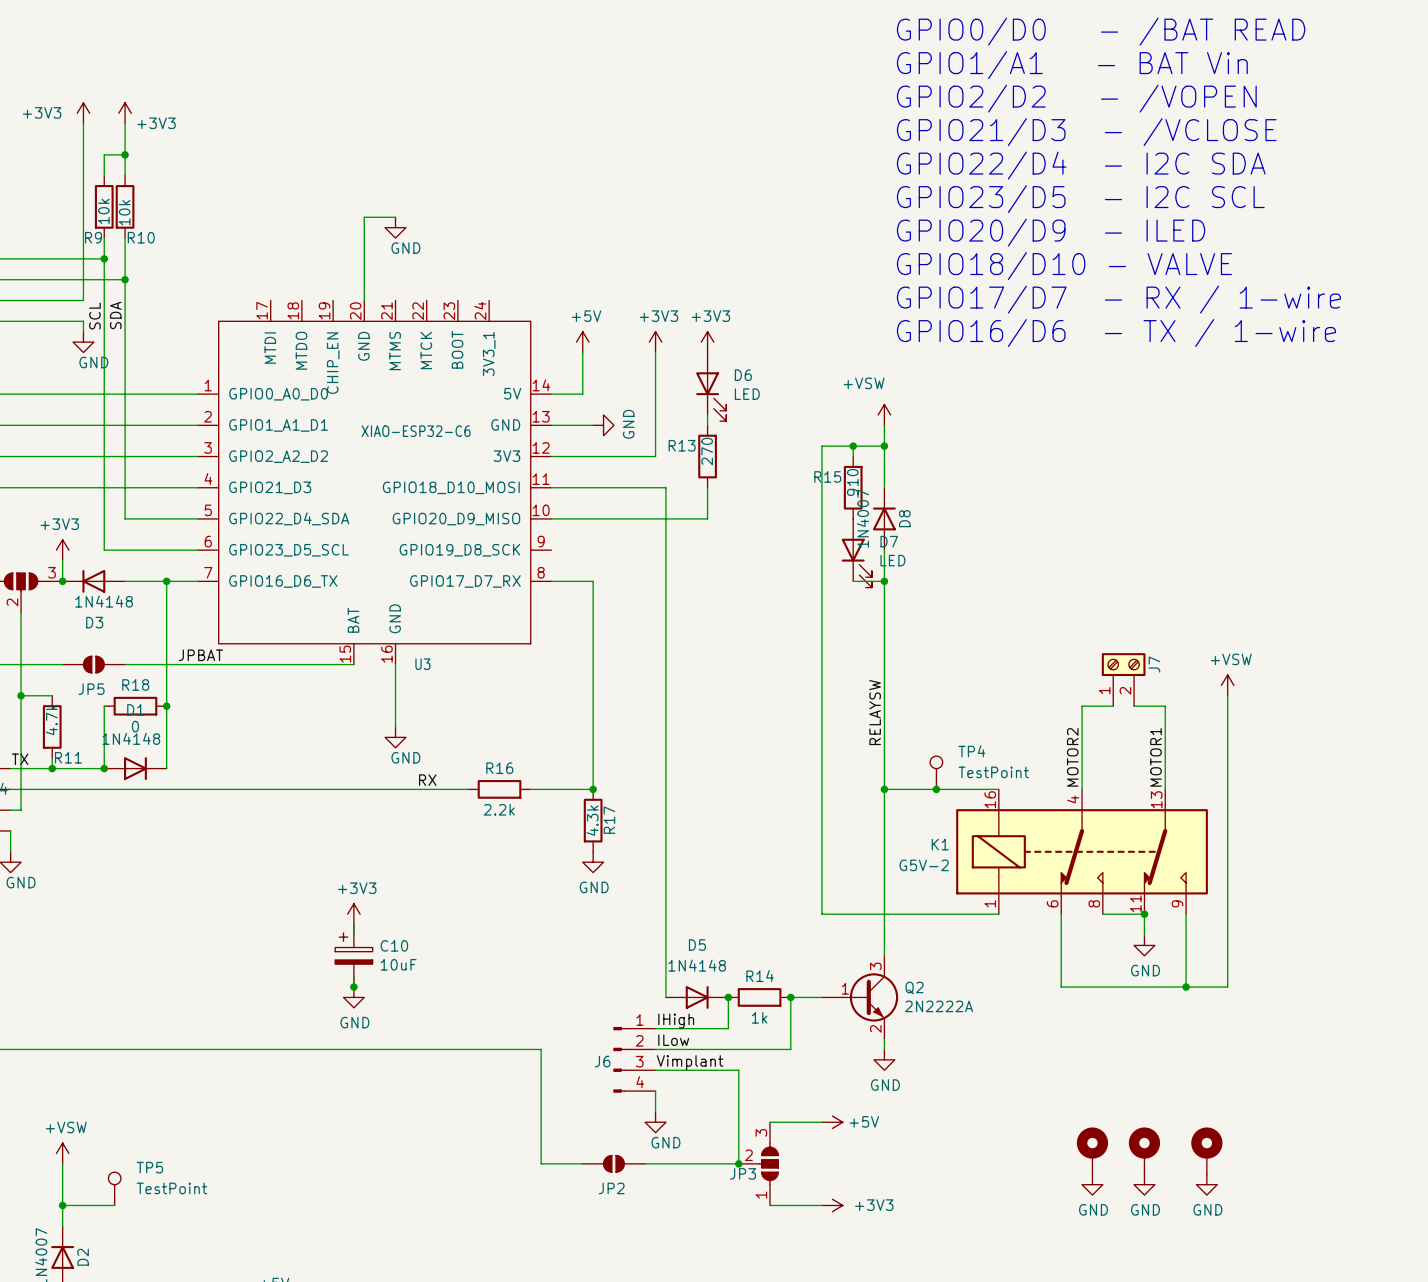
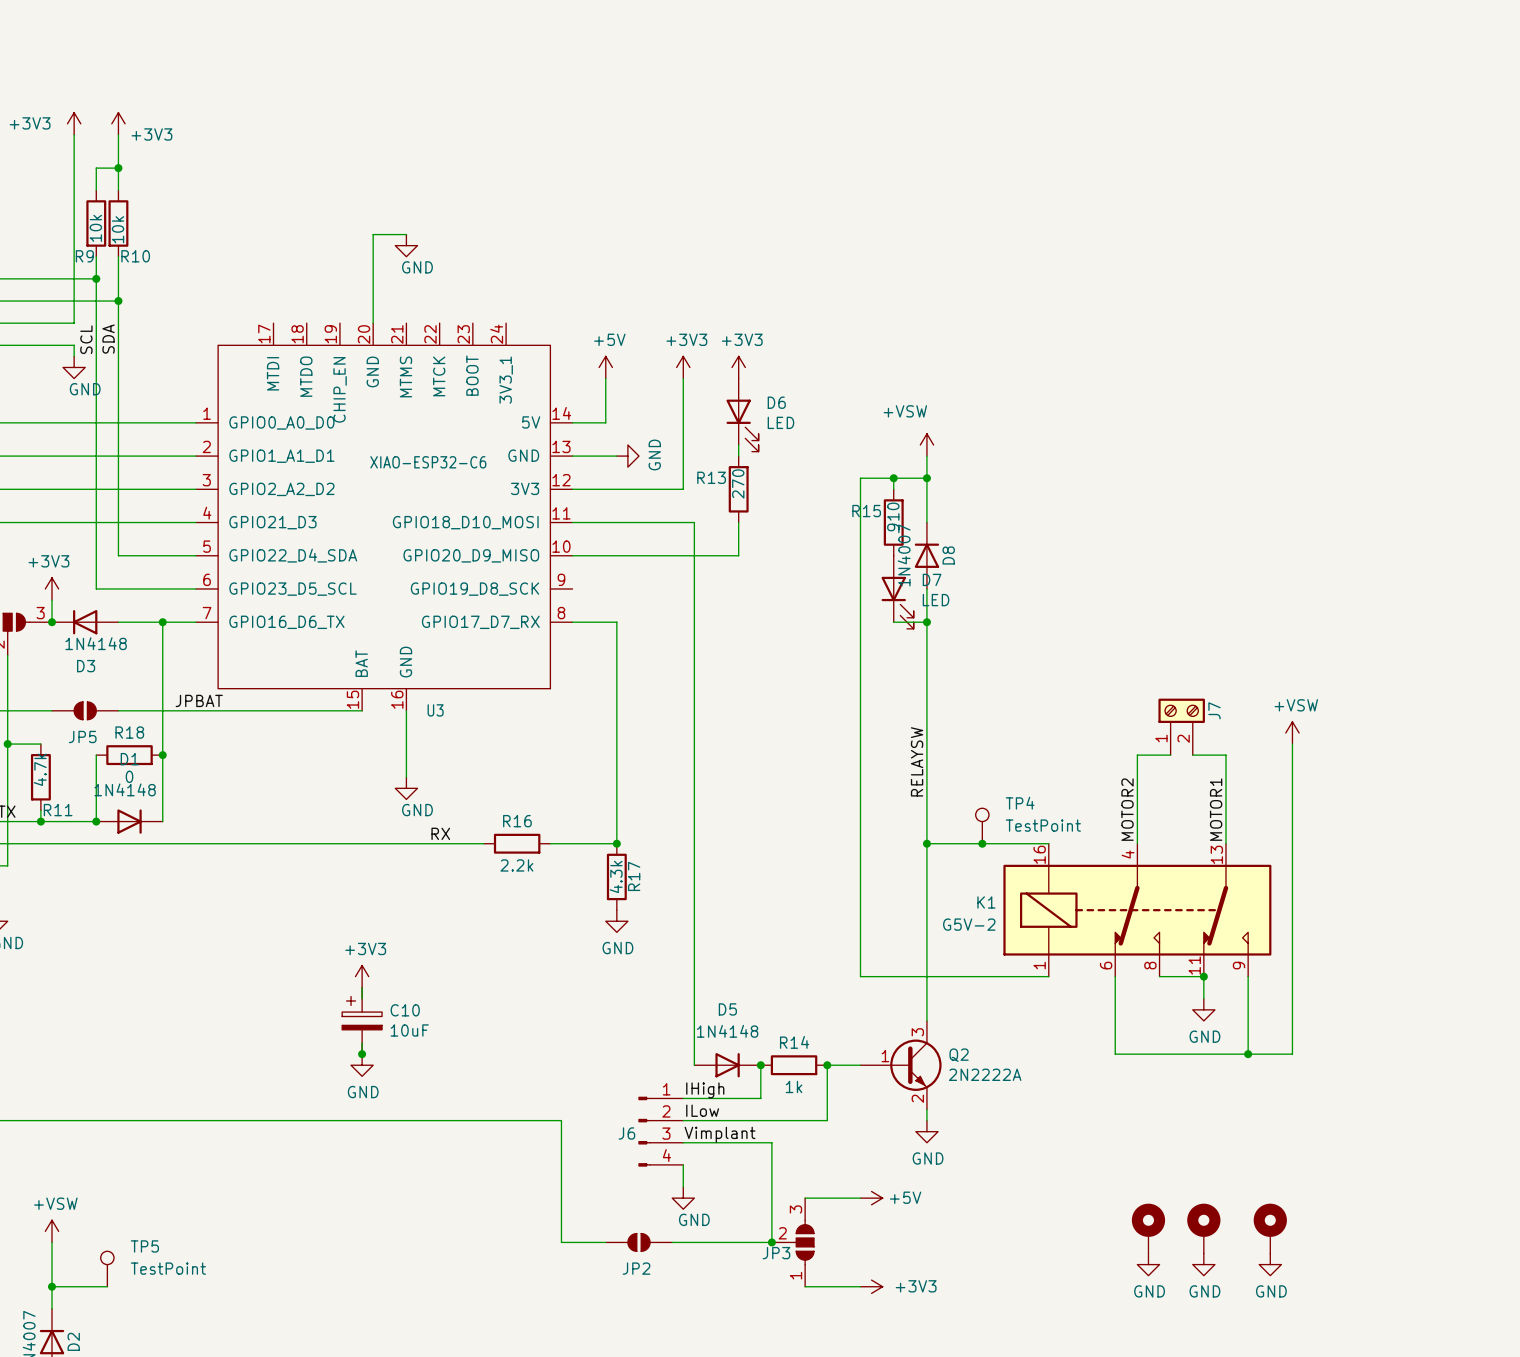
text: GPIO0/D0 - /BAT READ (1101, 31) -> none
text: GPIO1/A1 - BAT Vin (1072, 65) -> none
text: GPIO2/D2 - /VOPEN (1076, 98) -> none
text: GPIO21/D3 - /VCLOSE (1086, 132) -> none
text: GPIO22/D4 - I2C SDA (1081, 165) -> none
text: GPIO23/D5 - I2C SCL (1080, 199) -> none
text: GPIO20/D9 - ILED (1051, 232) -> none
text: GPIO18/D10 - VALVE (1064, 266) -> none
text: GPIO17/D7 - RX / 1-wire (1118, 299) -> none
text: GPIO16/D6 - TX / 1-wire (1116, 333) -> none

